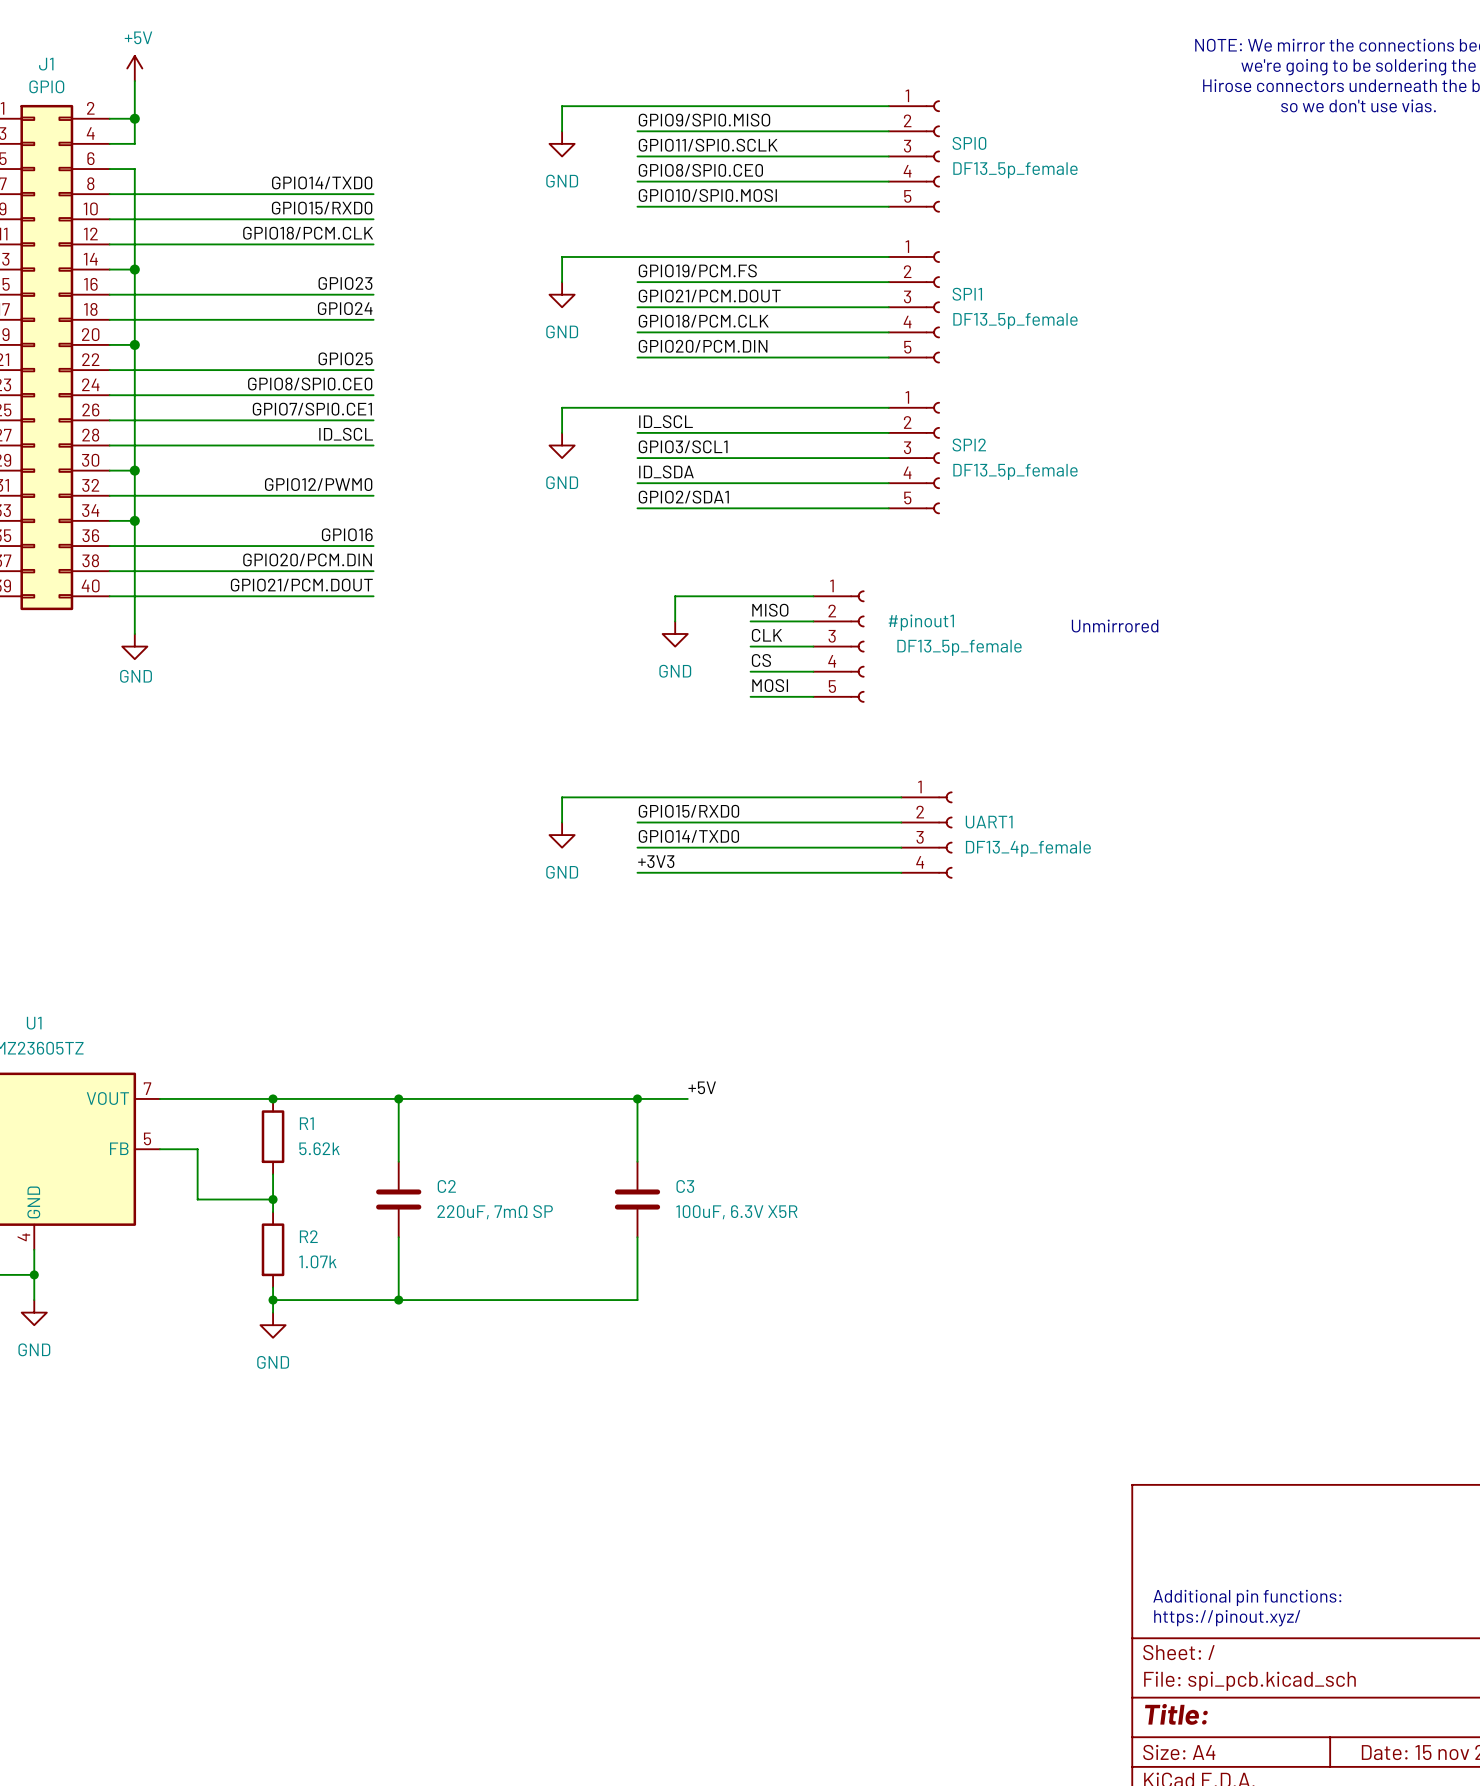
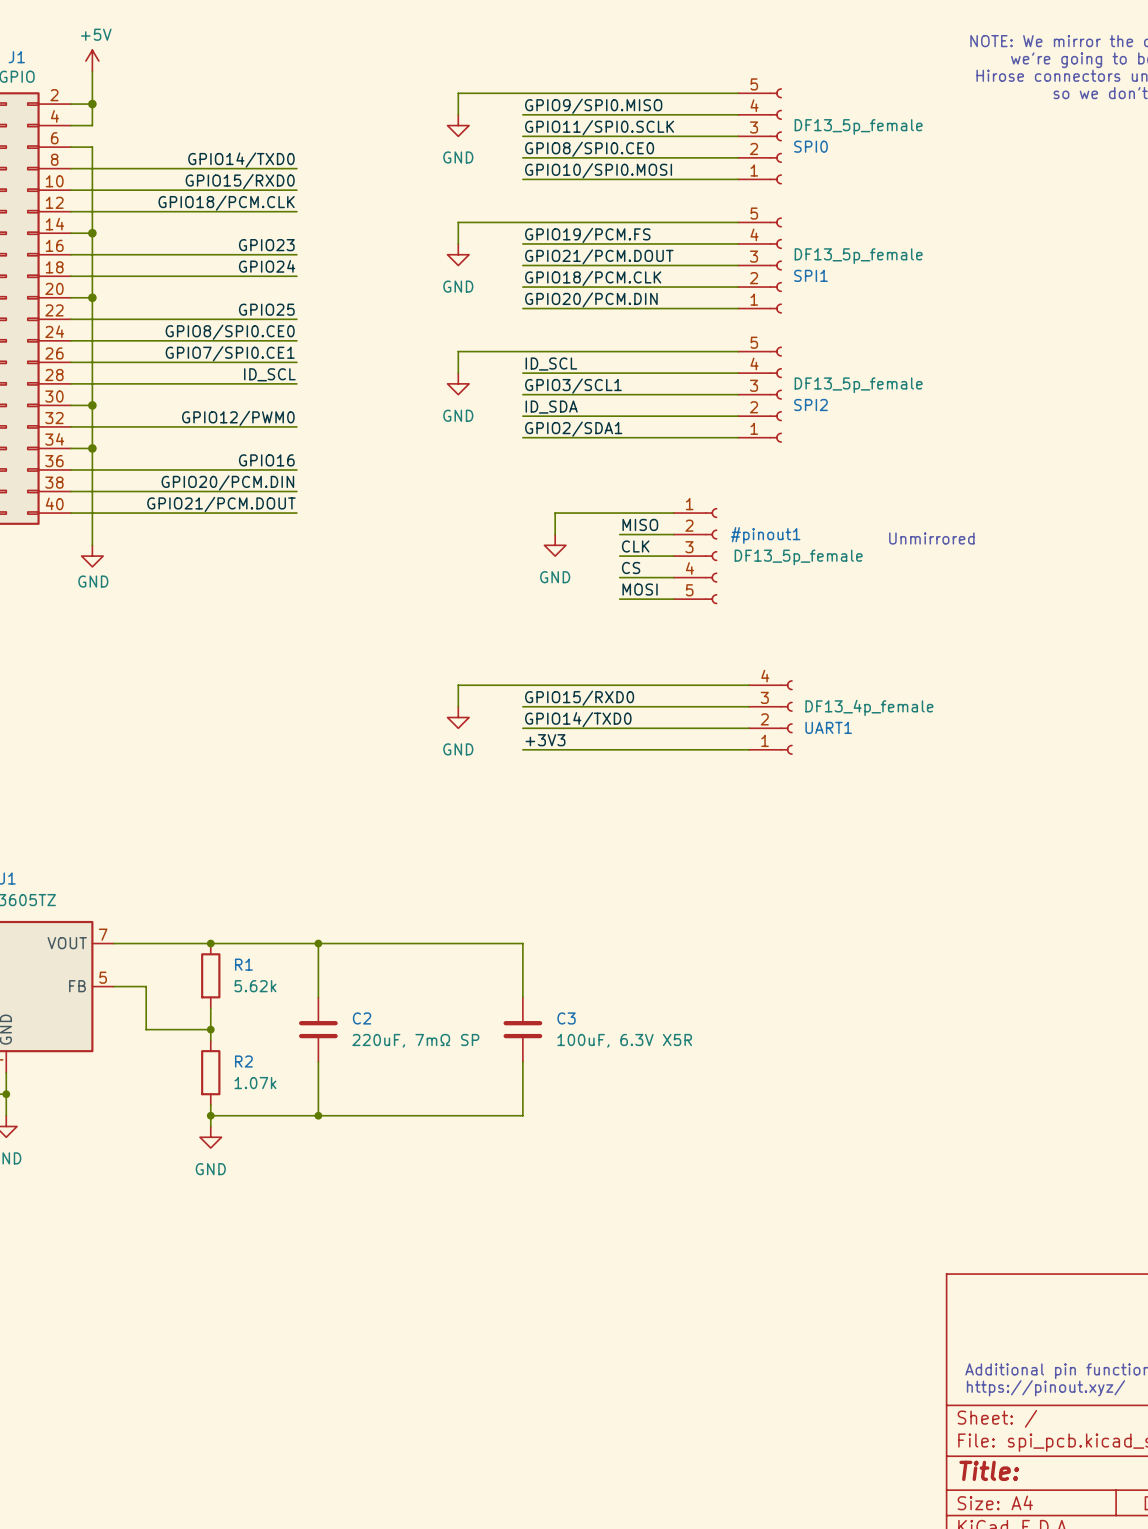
SPI0 flip: as is (932, 156) -> up-down (775, 136)
SPI1 flip: as is (932, 307) -> up-down (775, 265)
SPI2 flip: as is (932, 458) -> up-down (775, 394)
UART1 flip: as is (945, 835) -> up-down (786, 717)
label: +5V (702, 1087) -> none
wire: (637, 1098) (687, 1098) -> none
junction: (637, 1098) -> none

